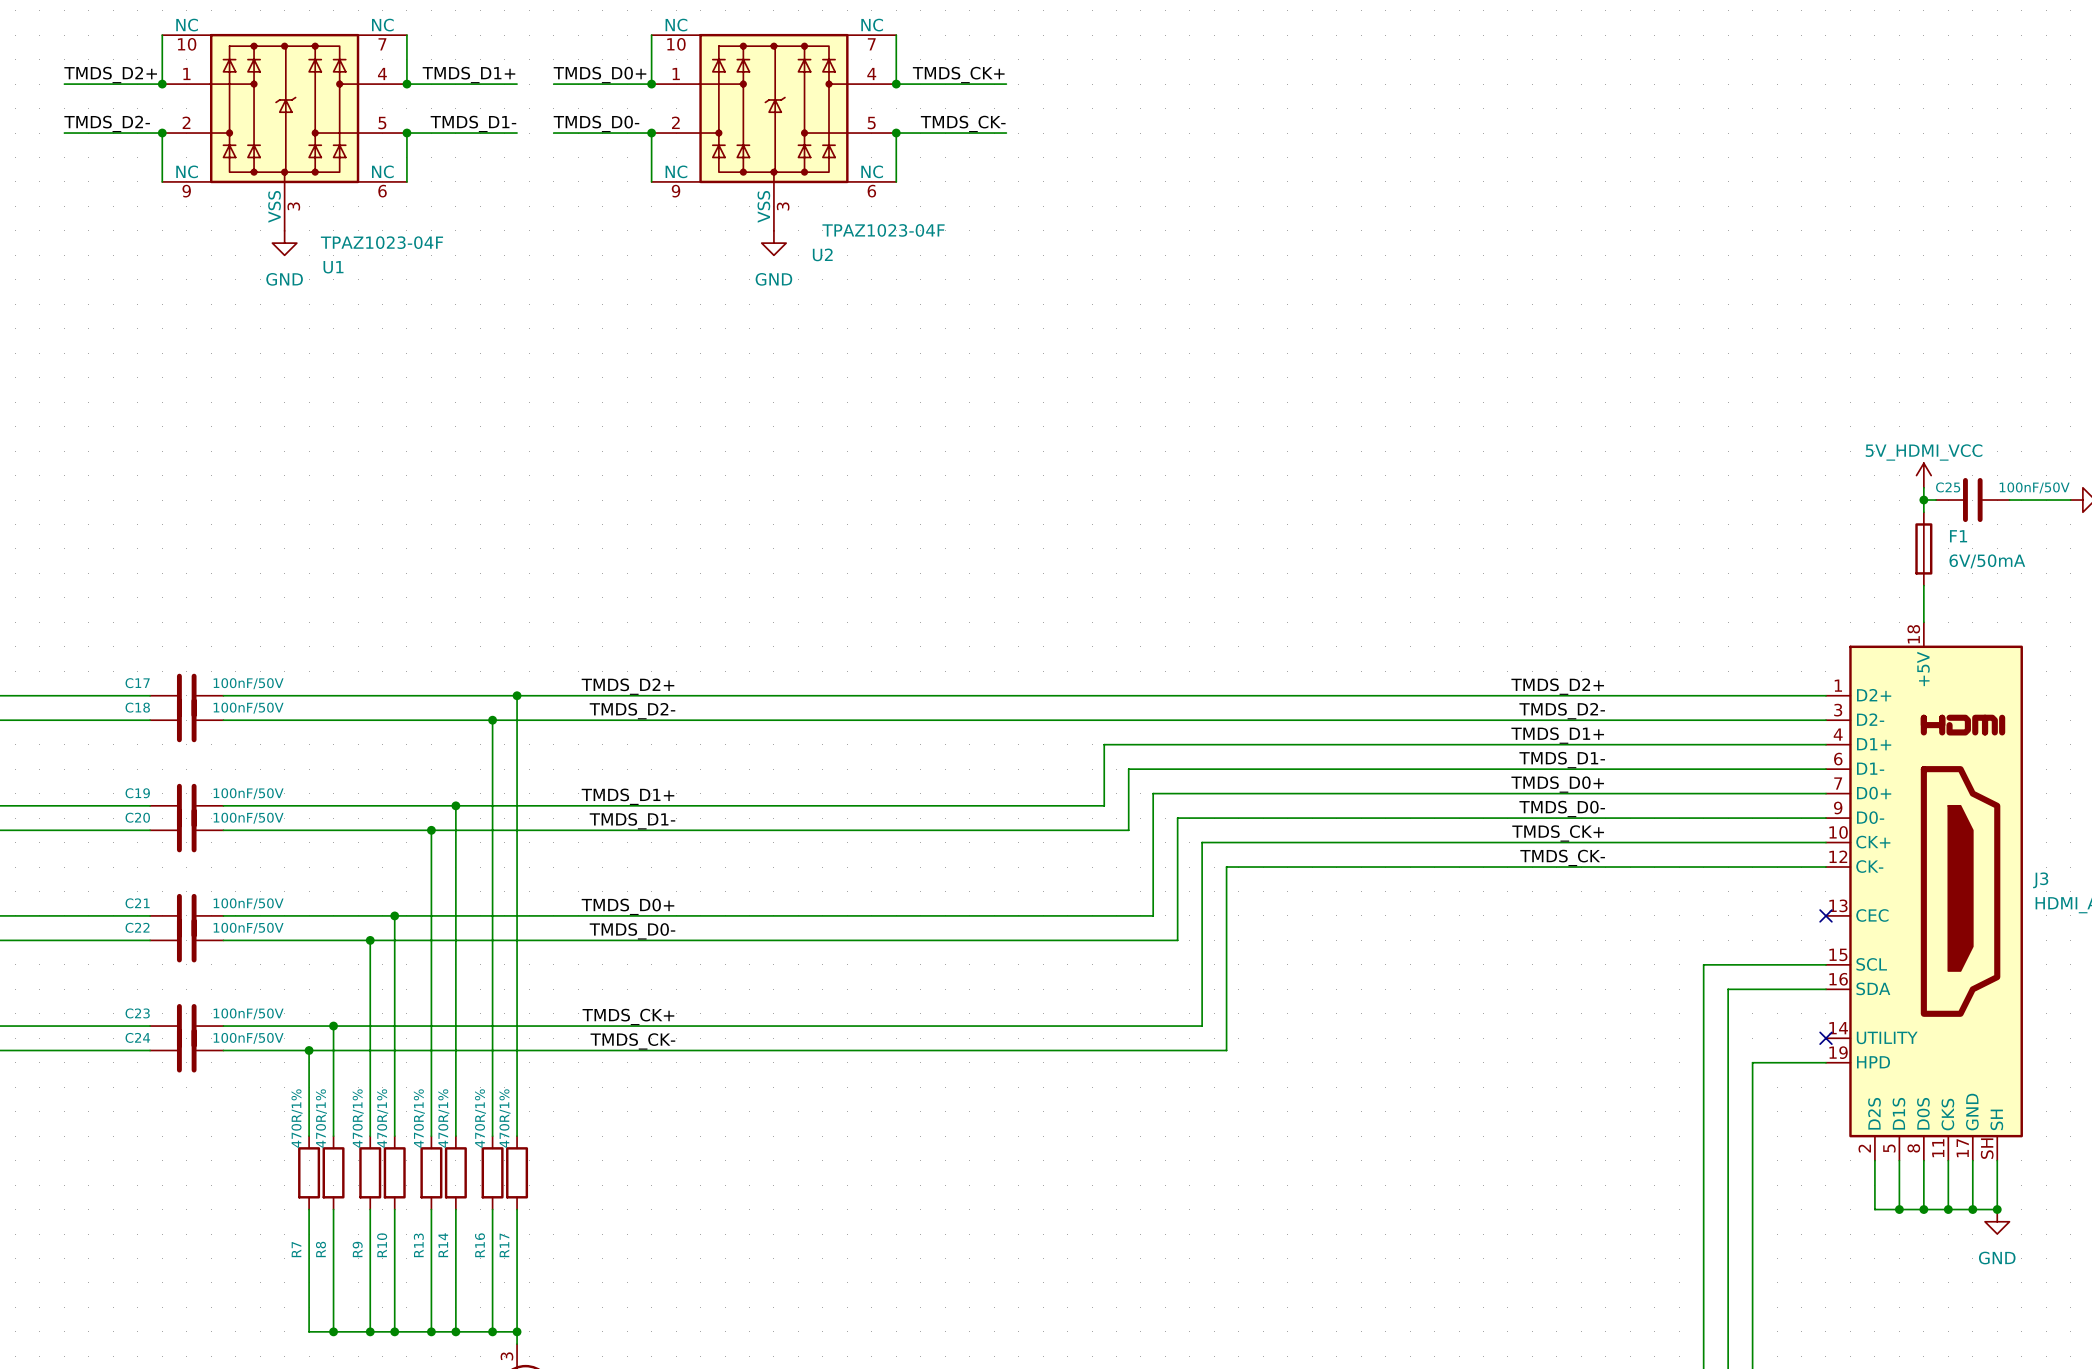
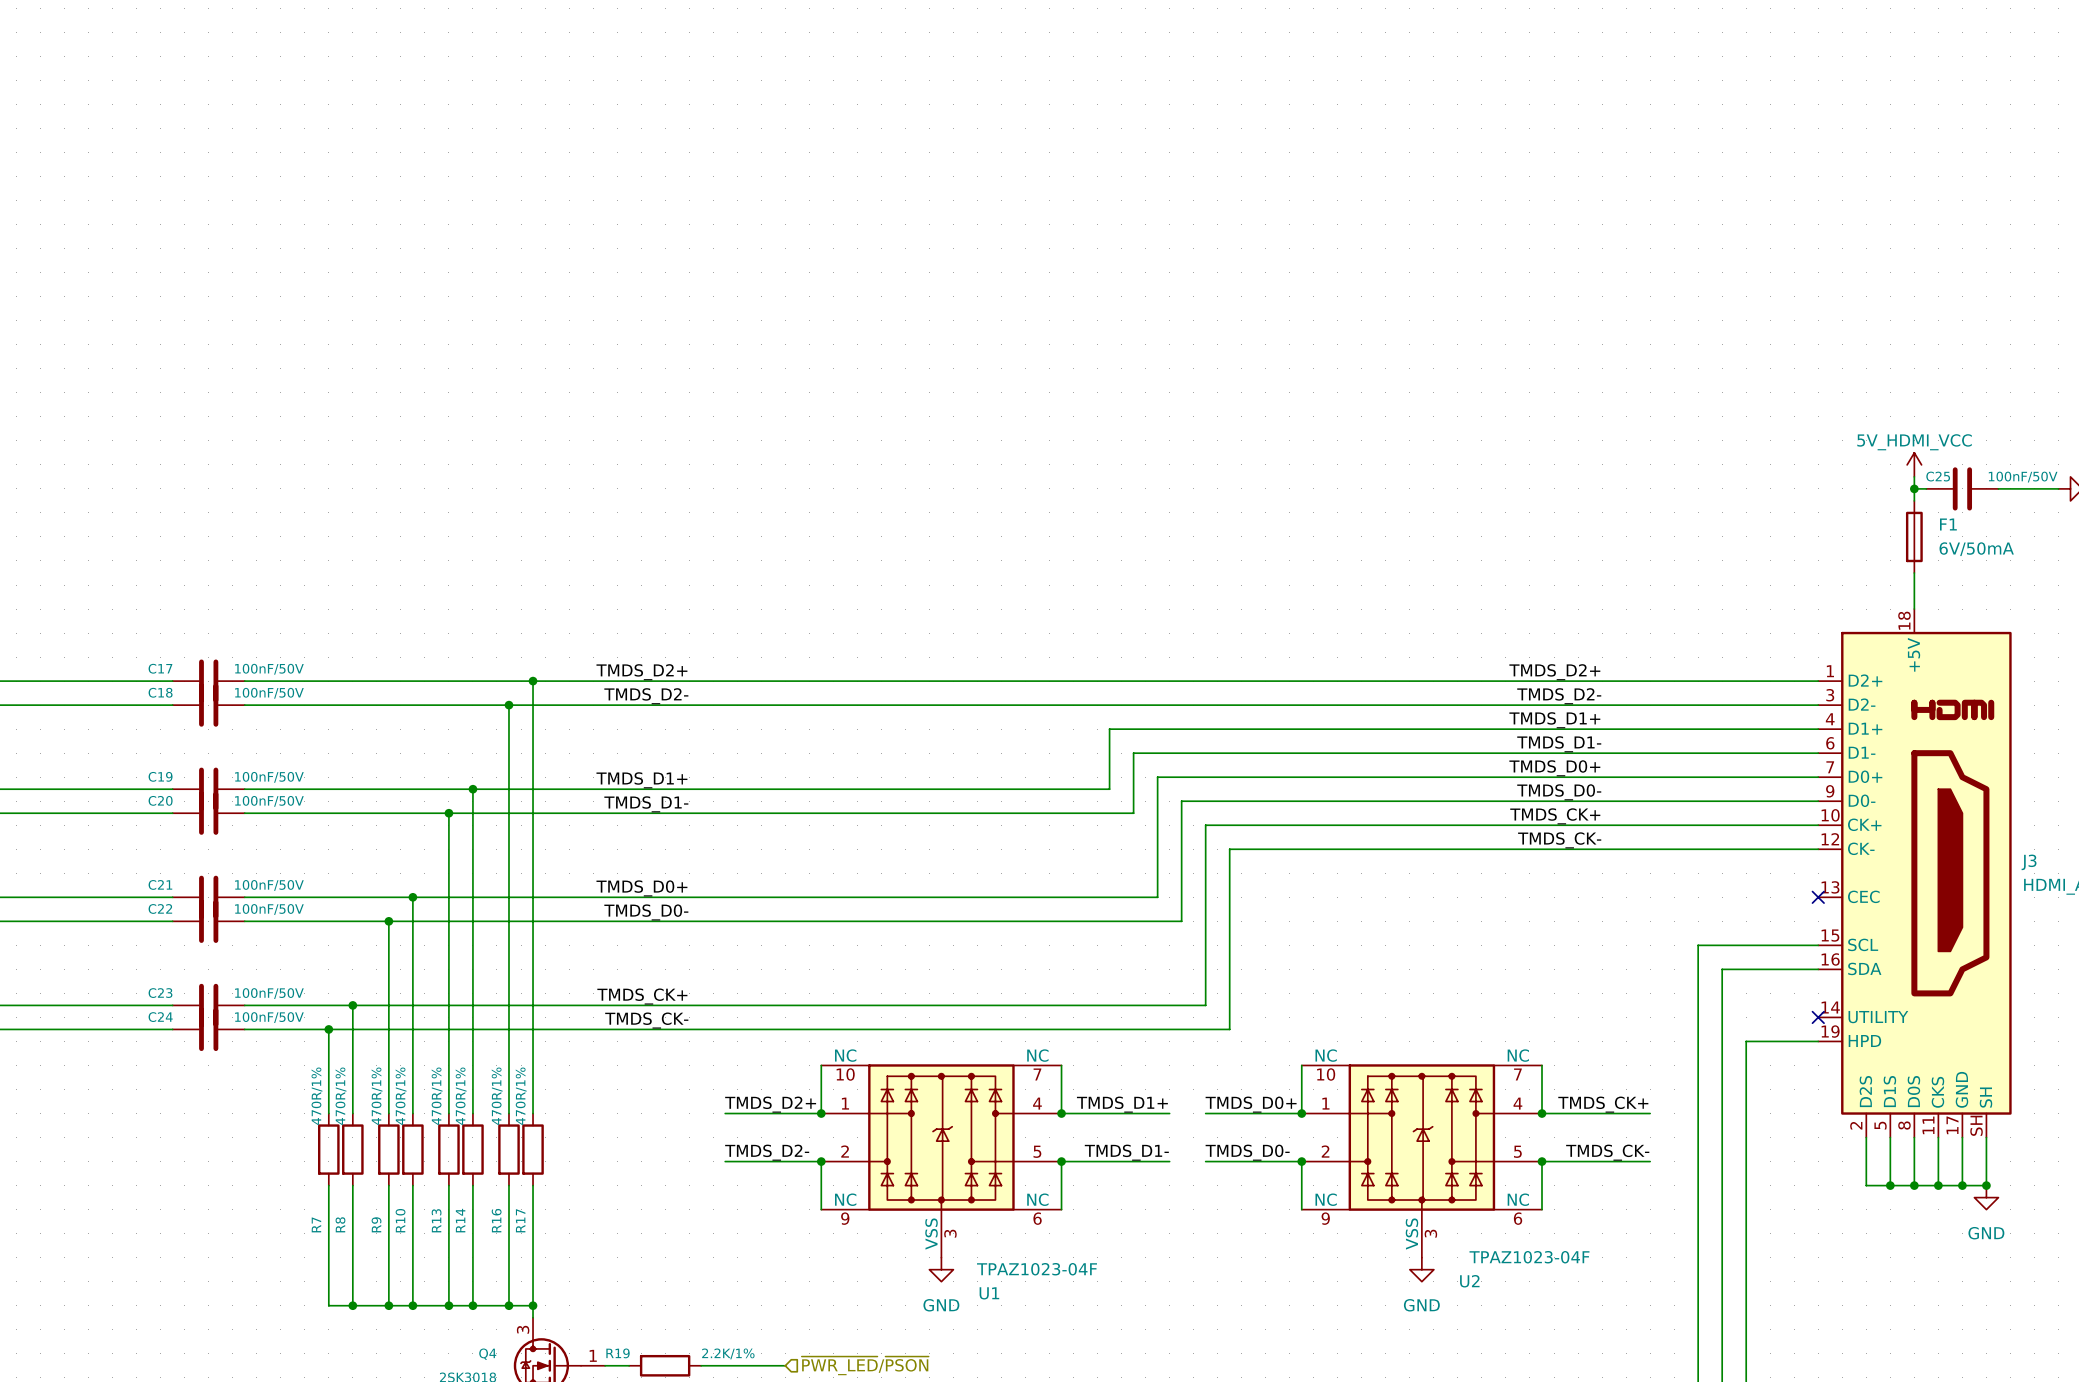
wire: (162, 35) (162, 84) (64, 84) -> none
wire: (406, 35) (406, 84) (517, 84) -> none
wire: (651, 35) (651, 84) (553, 84) -> none
wire: (896, 35) (896, 84) (1006, 84) -> none
label: TMDS_D2+ (110, 75) -> none
label: TMDS_D1+ (468, 75) -> none
label: TMDS_D0+ (600, 75) -> none
label: TMDS_CK+ (958, 75) -> none
junction: (162, 84) -> none
junction: (406, 84) -> none
junction: (651, 84) -> none
junction: (896, 84) -> none
label: TMDS_D2- (107, 123) -> none
label: TMDS_D1- (473, 123) -> none
label: TMDS_D0- (596, 123) -> none
label: TMDS_CK- (963, 123) -> none
U1 position: (284, 132) -> (941, 1160)
U2 position: (773, 132) -> (1421, 1160)
wire: (64, 133) (162, 133) (162, 181) -> none
junction: (162, 133) -> none
junction: (406, 133) -> none
wire: (517, 133) (406, 133) (406, 181) -> none
wire: (553, 133) (651, 133) (651, 181) -> none
junction: (651, 133) -> none
junction: (896, 133) -> none
wire: (1006, 133) (896, 133) (896, 181) -> none
power symbol: GND (284, 243) -> none
power symbol: GND (773, 243) -> none
wire: none -> (821, 1065) (821, 1113) (725, 1113)
wire: none -> (1061, 1065) (1061, 1113) (1169, 1113)
wire: none -> (1301, 1065) (1301, 1113) (1205, 1113)
wire: none -> (1542, 1065) (1542, 1113) (1650, 1113)
label: none -> TMDS_D2+ (770, 1104)
label: none -> TMDS_D1+ (1122, 1104)
label: none -> TMDS_D0+ (1251, 1104)
label: none -> TMDS_CK+ (1603, 1104)
junction: none -> (821, 1113)
junction: none -> (1061, 1113)
junction: none -> (1301, 1113)
junction: none -> (1542, 1113)
label: none -> TMDS_D2- (767, 1152)
label: none -> TMDS_D1- (1126, 1152)
label: none -> TMDS_D0- (1247, 1152)
label: none -> TMDS_CK- (1607, 1152)
wire: none -> (725, 1161) (821, 1161) (821, 1209)
junction: none -> (821, 1161)
junction: none -> (1061, 1161)
wire: none -> (1169, 1161) (1061, 1161) (1061, 1209)
wire: none -> (1205, 1161) (1301, 1161) (1301, 1209)
junction: none -> (1301, 1161)
junction: none -> (1542, 1161)
wire: none -> (1650, 1161) (1542, 1161) (1542, 1209)
power symbol: none -> GND (941, 1269)
power symbol: none -> GND (1421, 1269)

